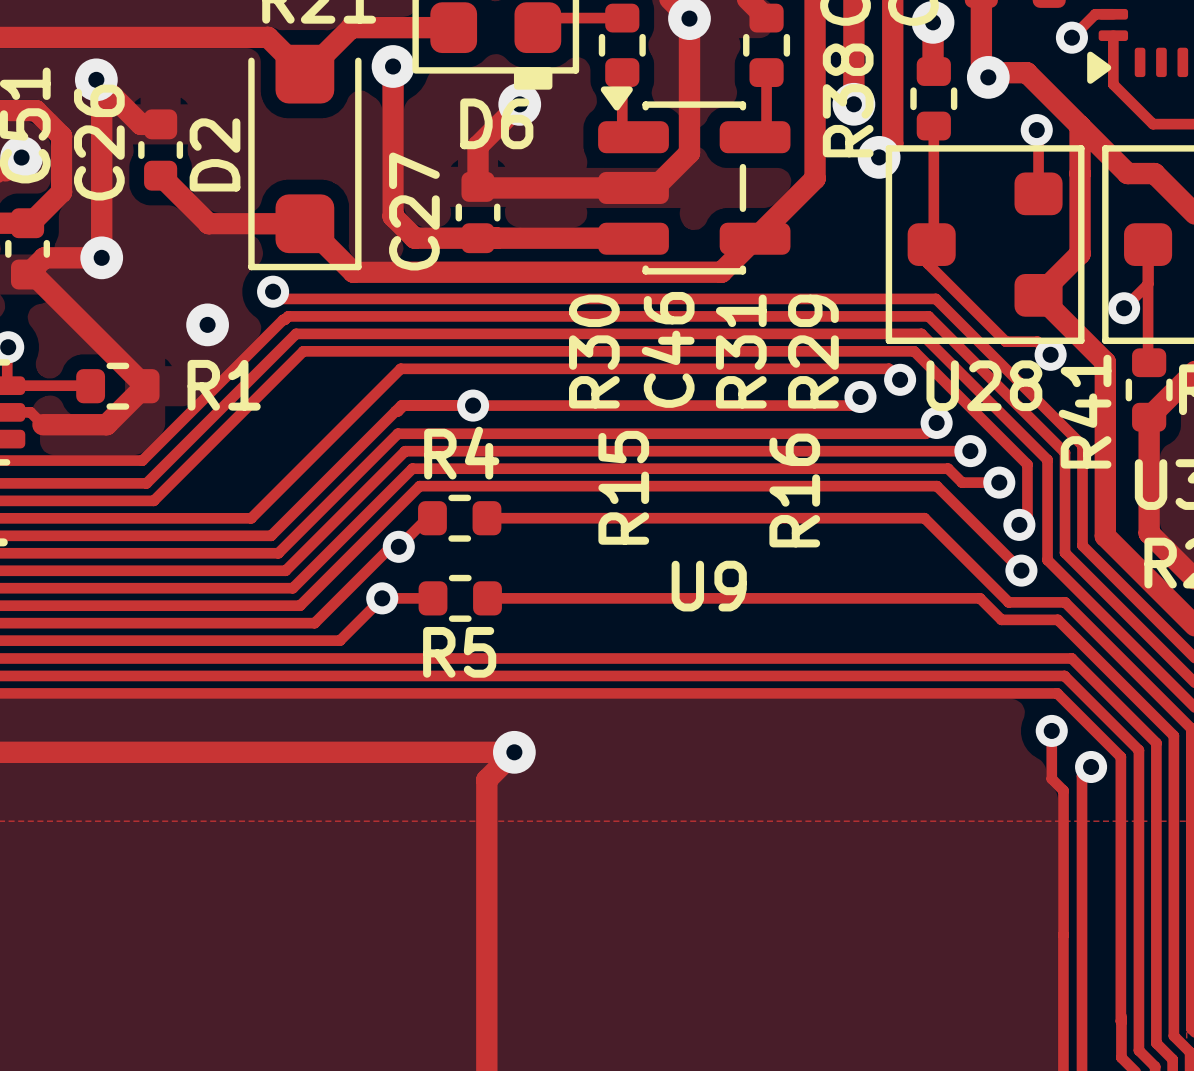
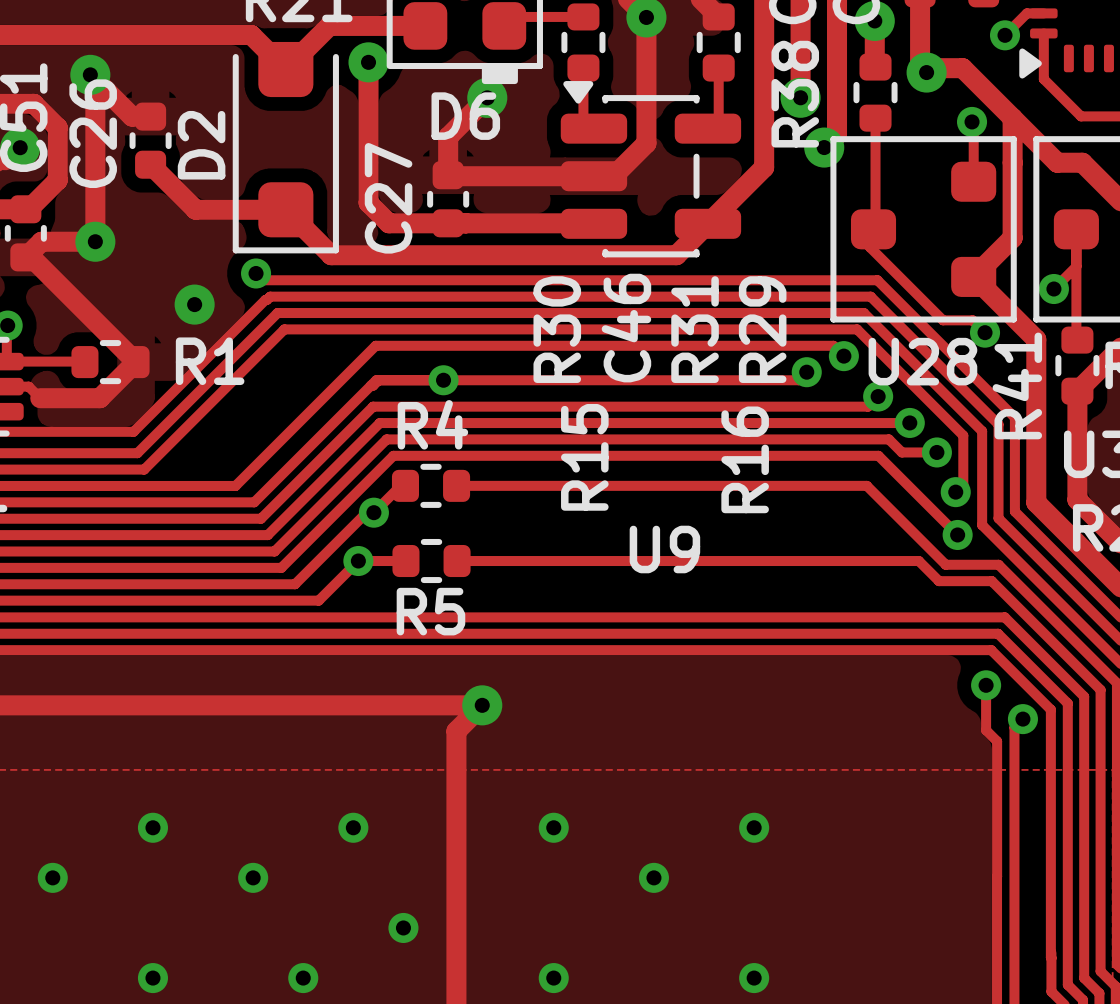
via: none -> (152, 827)
via: none -> (353, 827)
via: none -> (553, 827)
via: none -> (754, 827)
via: none -> (52, 877)
via: none -> (253, 877)
via: none -> (653, 877)
via: none -> (403, 927)
via: none -> (152, 978)
via: none -> (303, 978)
via: none -> (553, 978)
via: none -> (754, 978)

